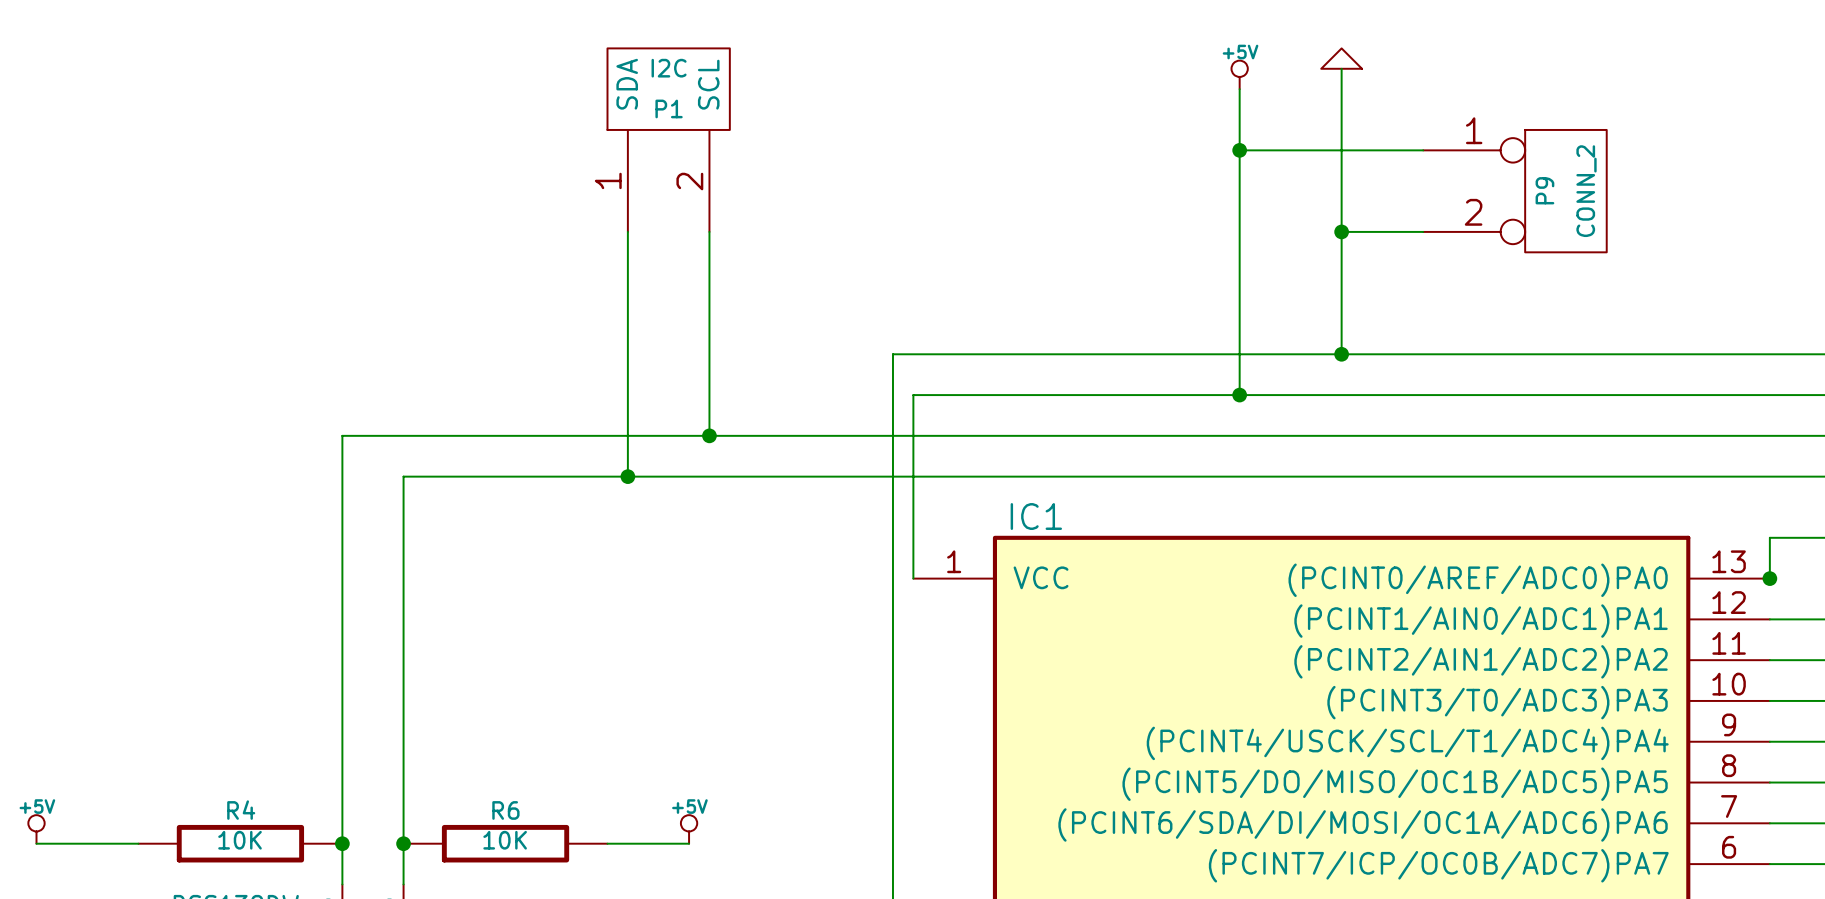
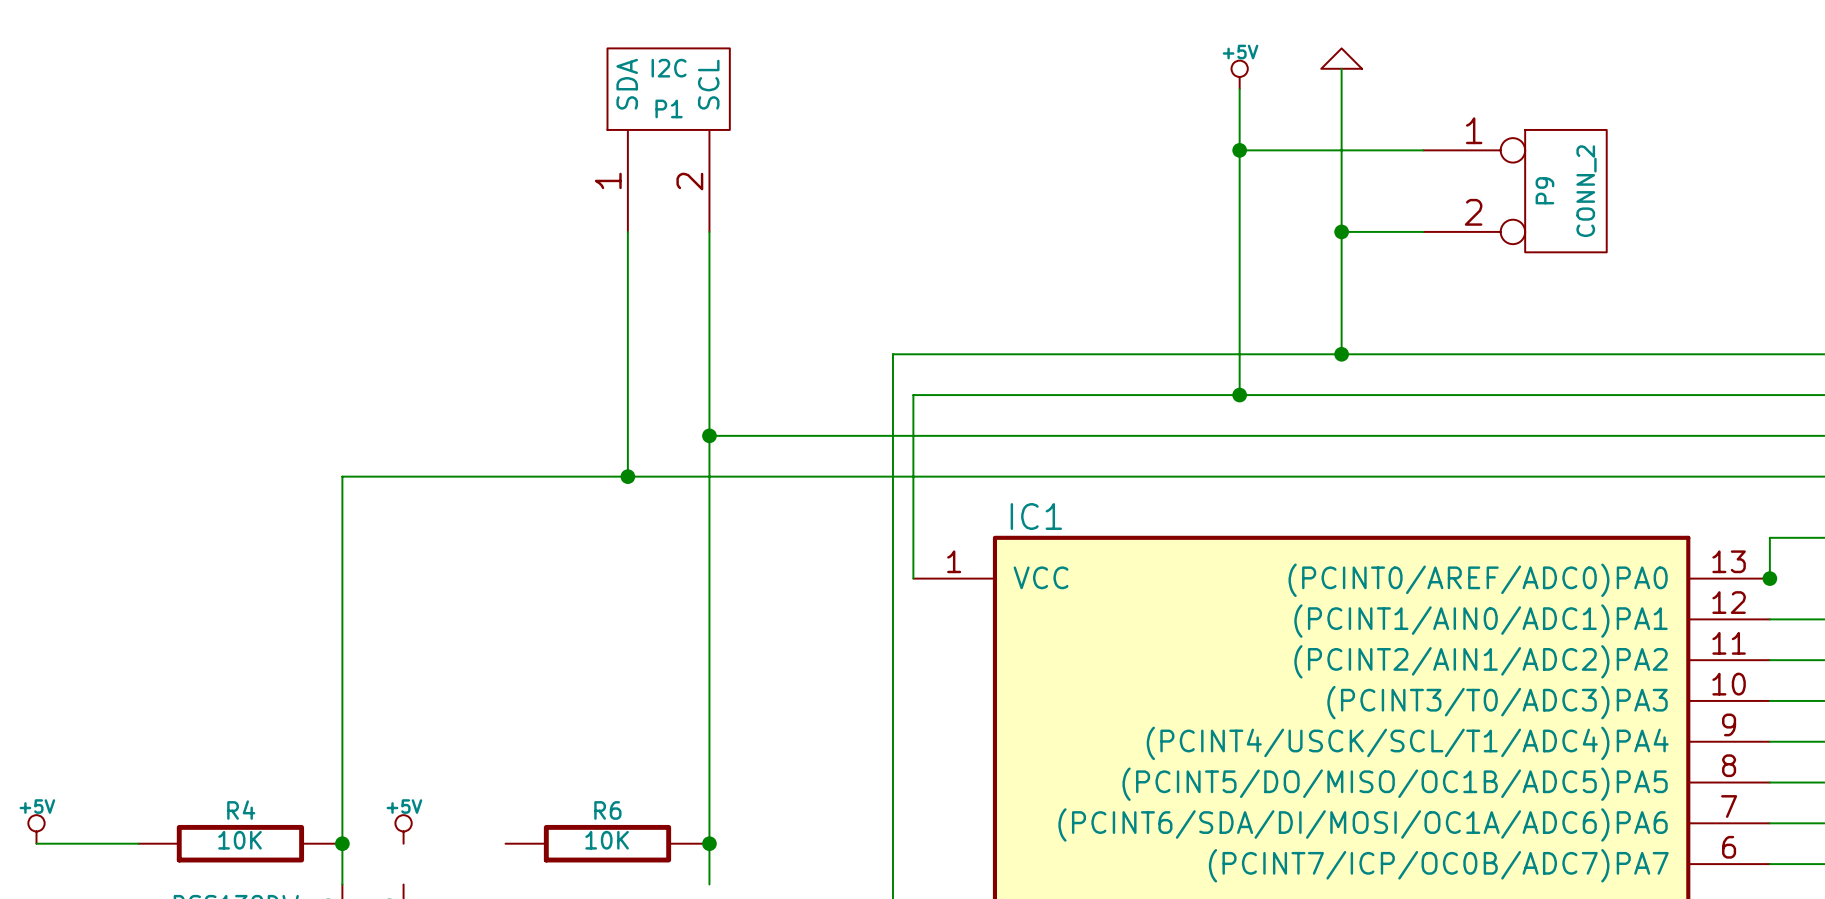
wire: (709, 435) (342, 435) (342, 476) -> (403, 476) (342, 476)
wire: none -> (709, 435) (709, 884)
wire: (403, 476) (403, 884) -> none
power symbol position: +5V (689, 829) -> +5V (403, 829)
junction: (403, 843) -> none
R6 position: (505, 843) -> (607, 843)
wire: (607, 843) (689, 843) -> none
junction: none -> (709, 843)

